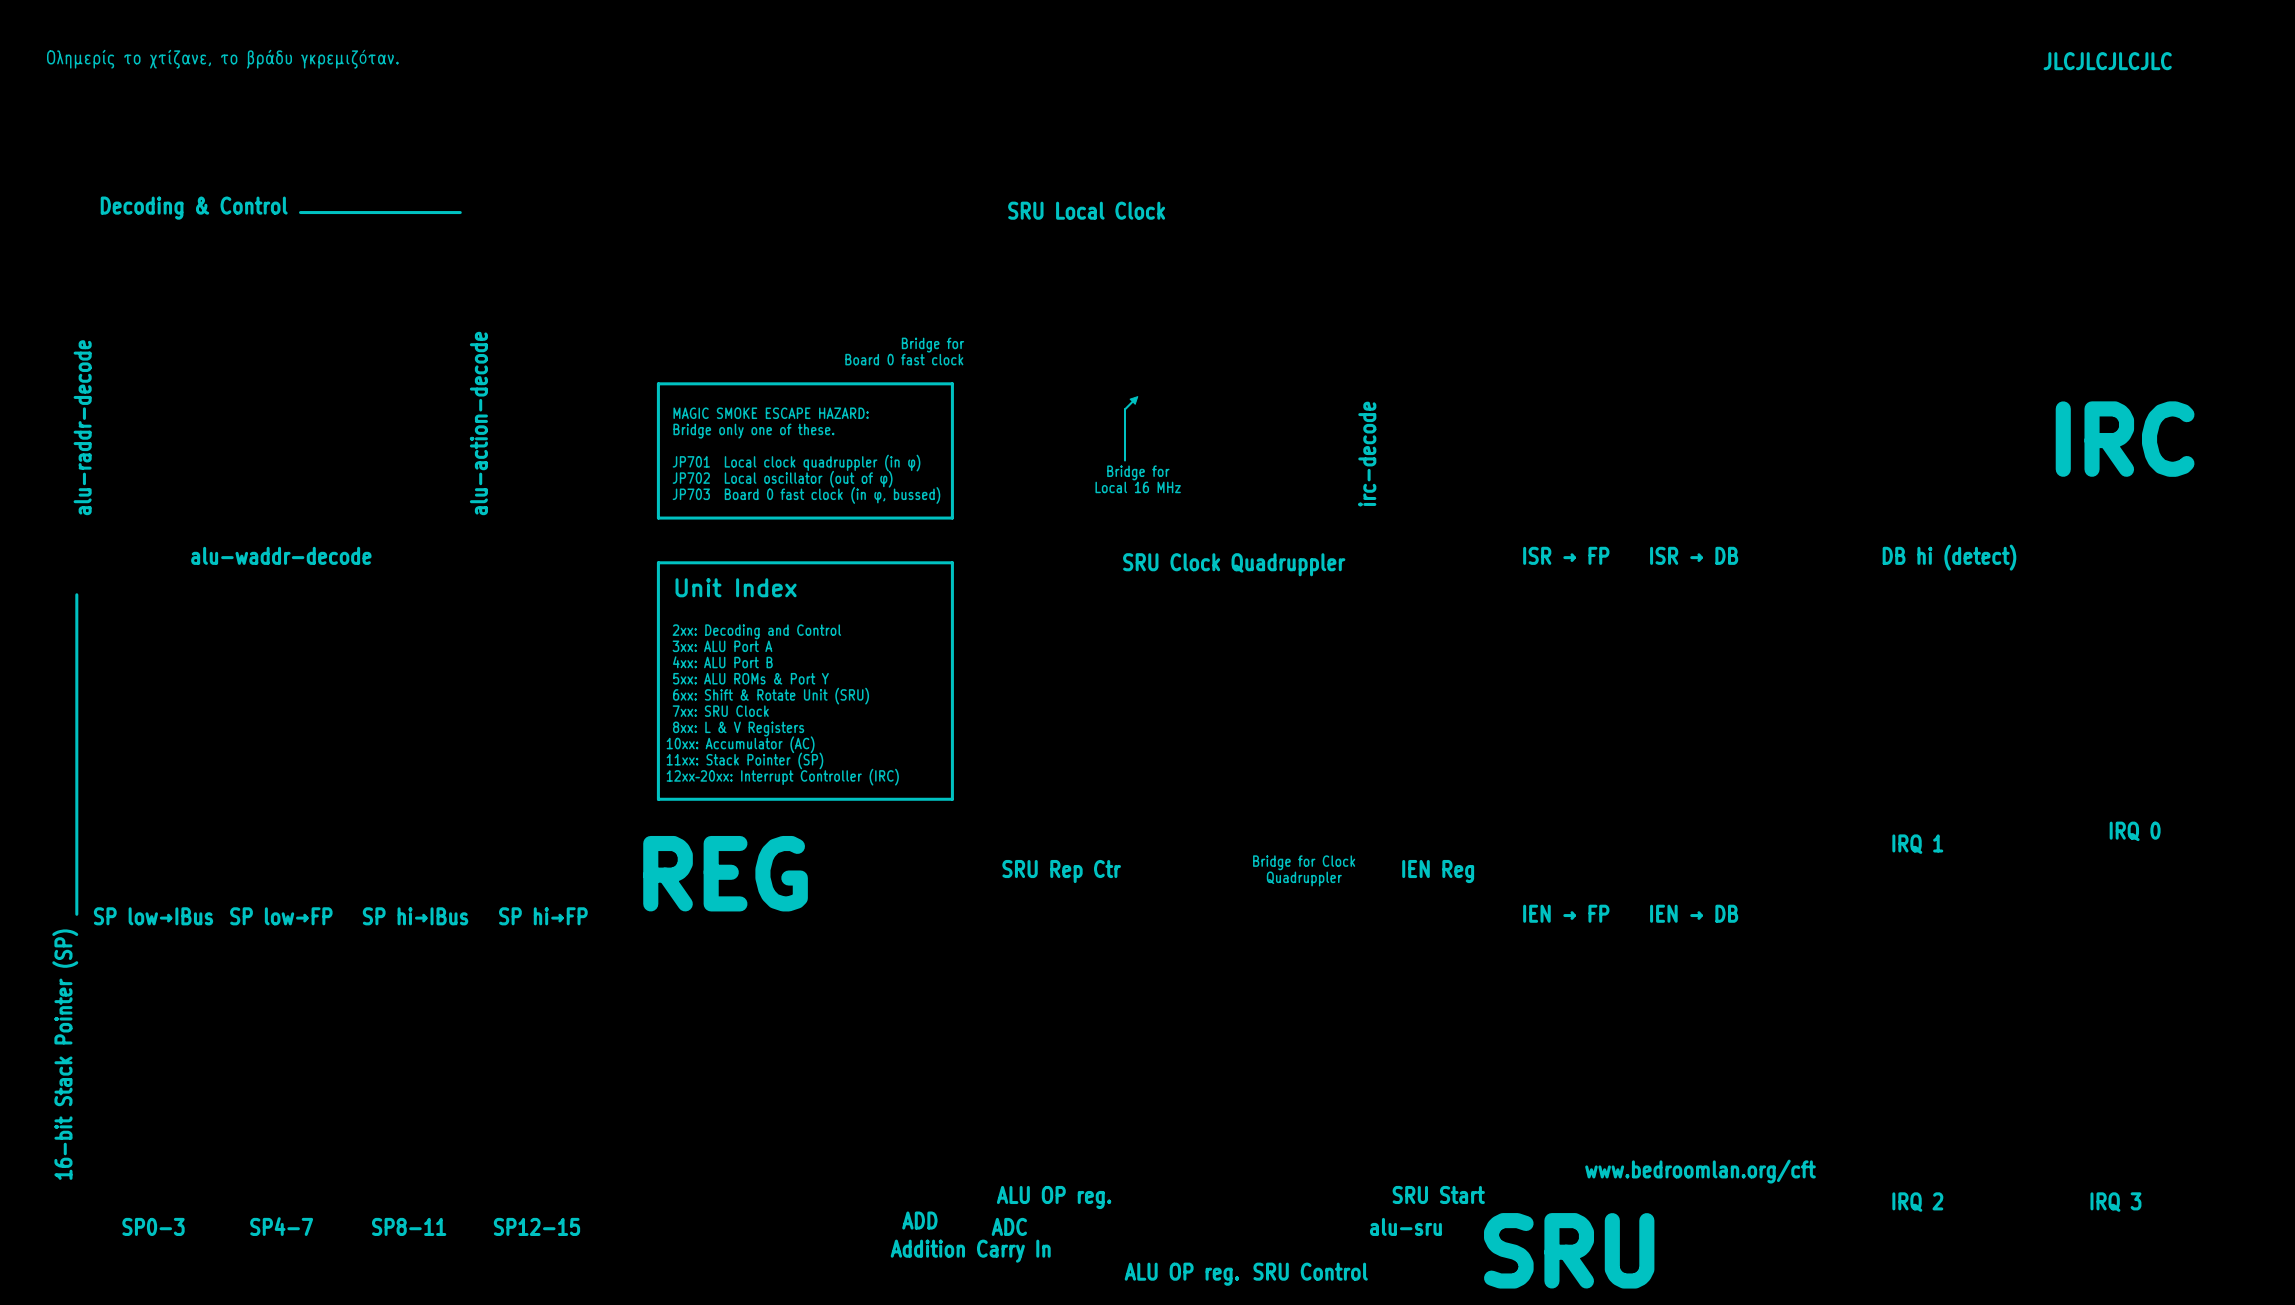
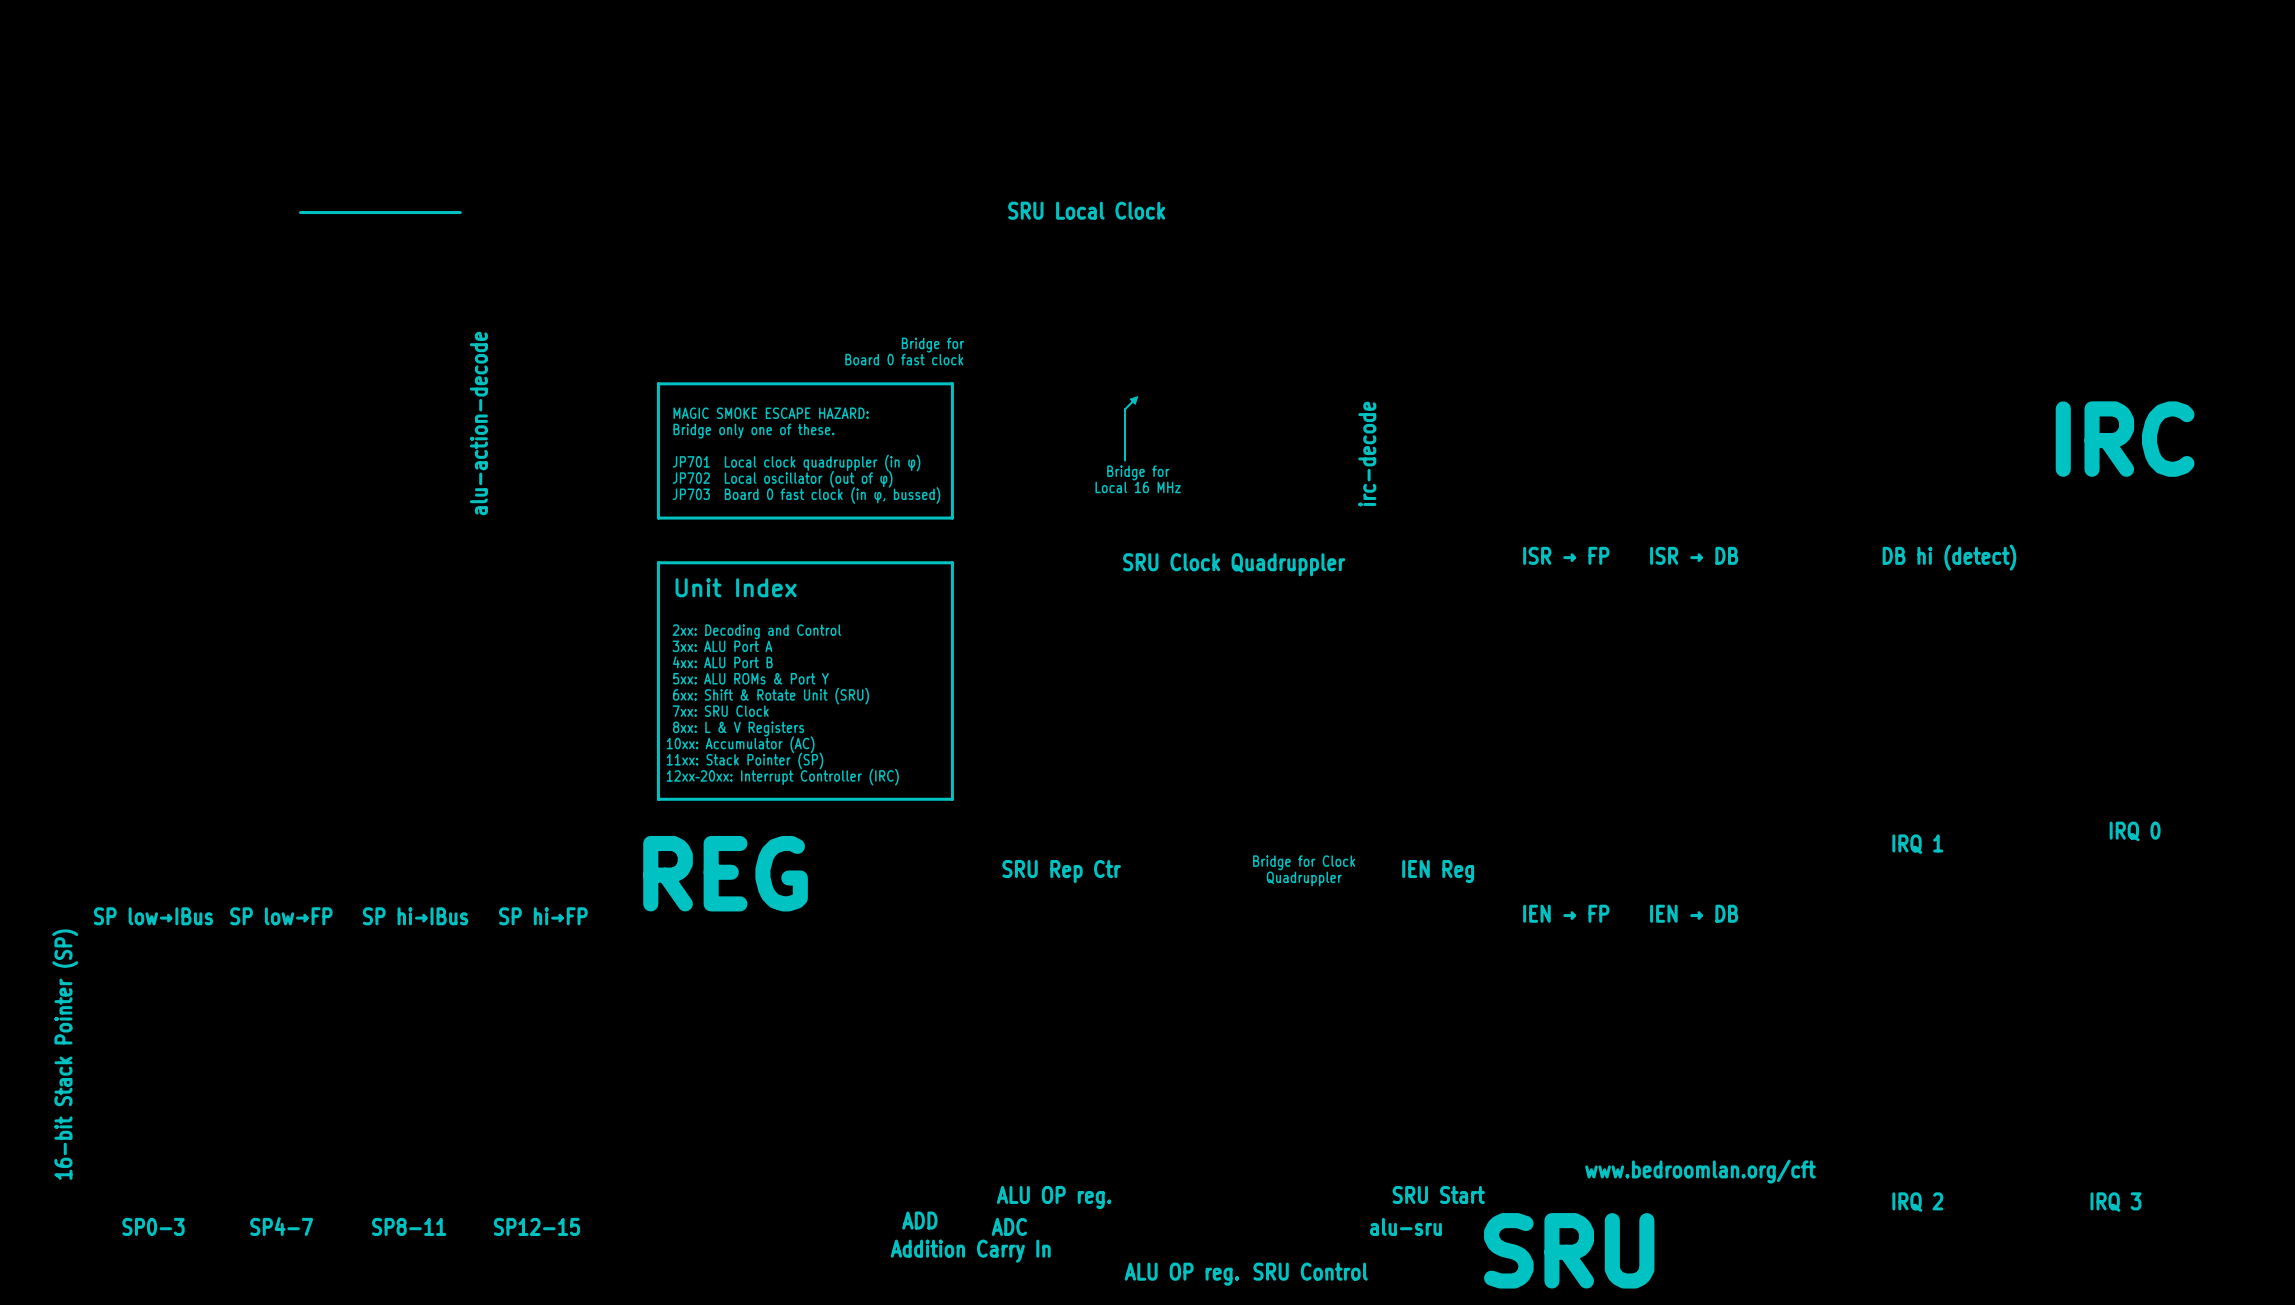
text: Ολημερίς το χτίζανε, το βράδυ γκρεμιζόταν. (222, 58) -> none
text: JLCJLCJLCJLC (2107, 61) -> none
text: Decoding & Control (194, 208) -> none
text: alu-raddr-decode (82, 427) -> none
text: alu-waddr-decode (281, 555) -> none
line: (76, 594) (76, 914) -> none

